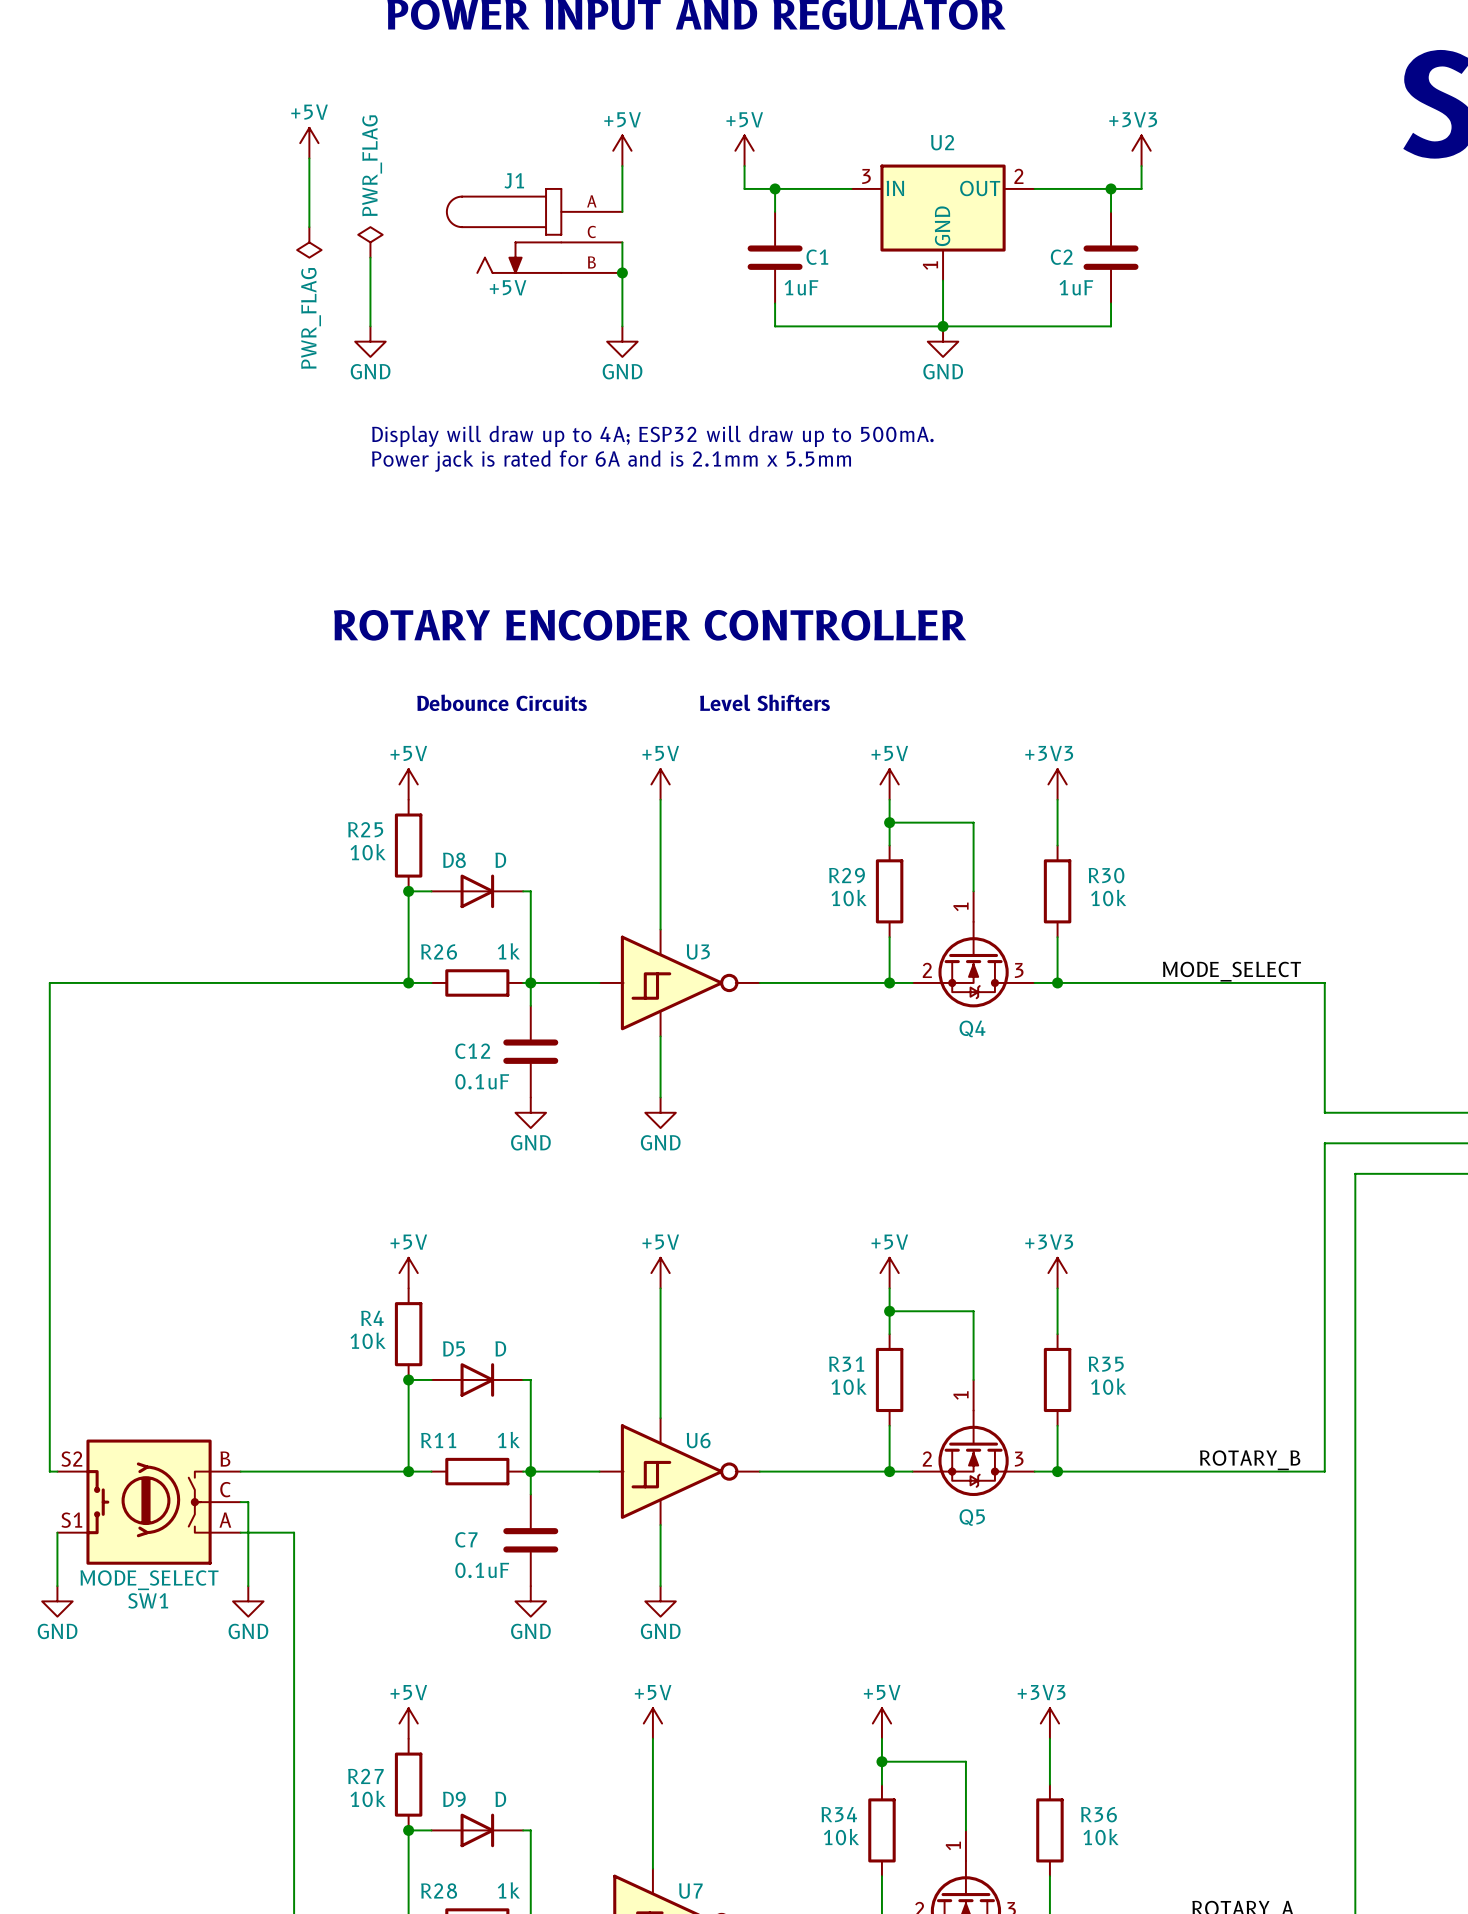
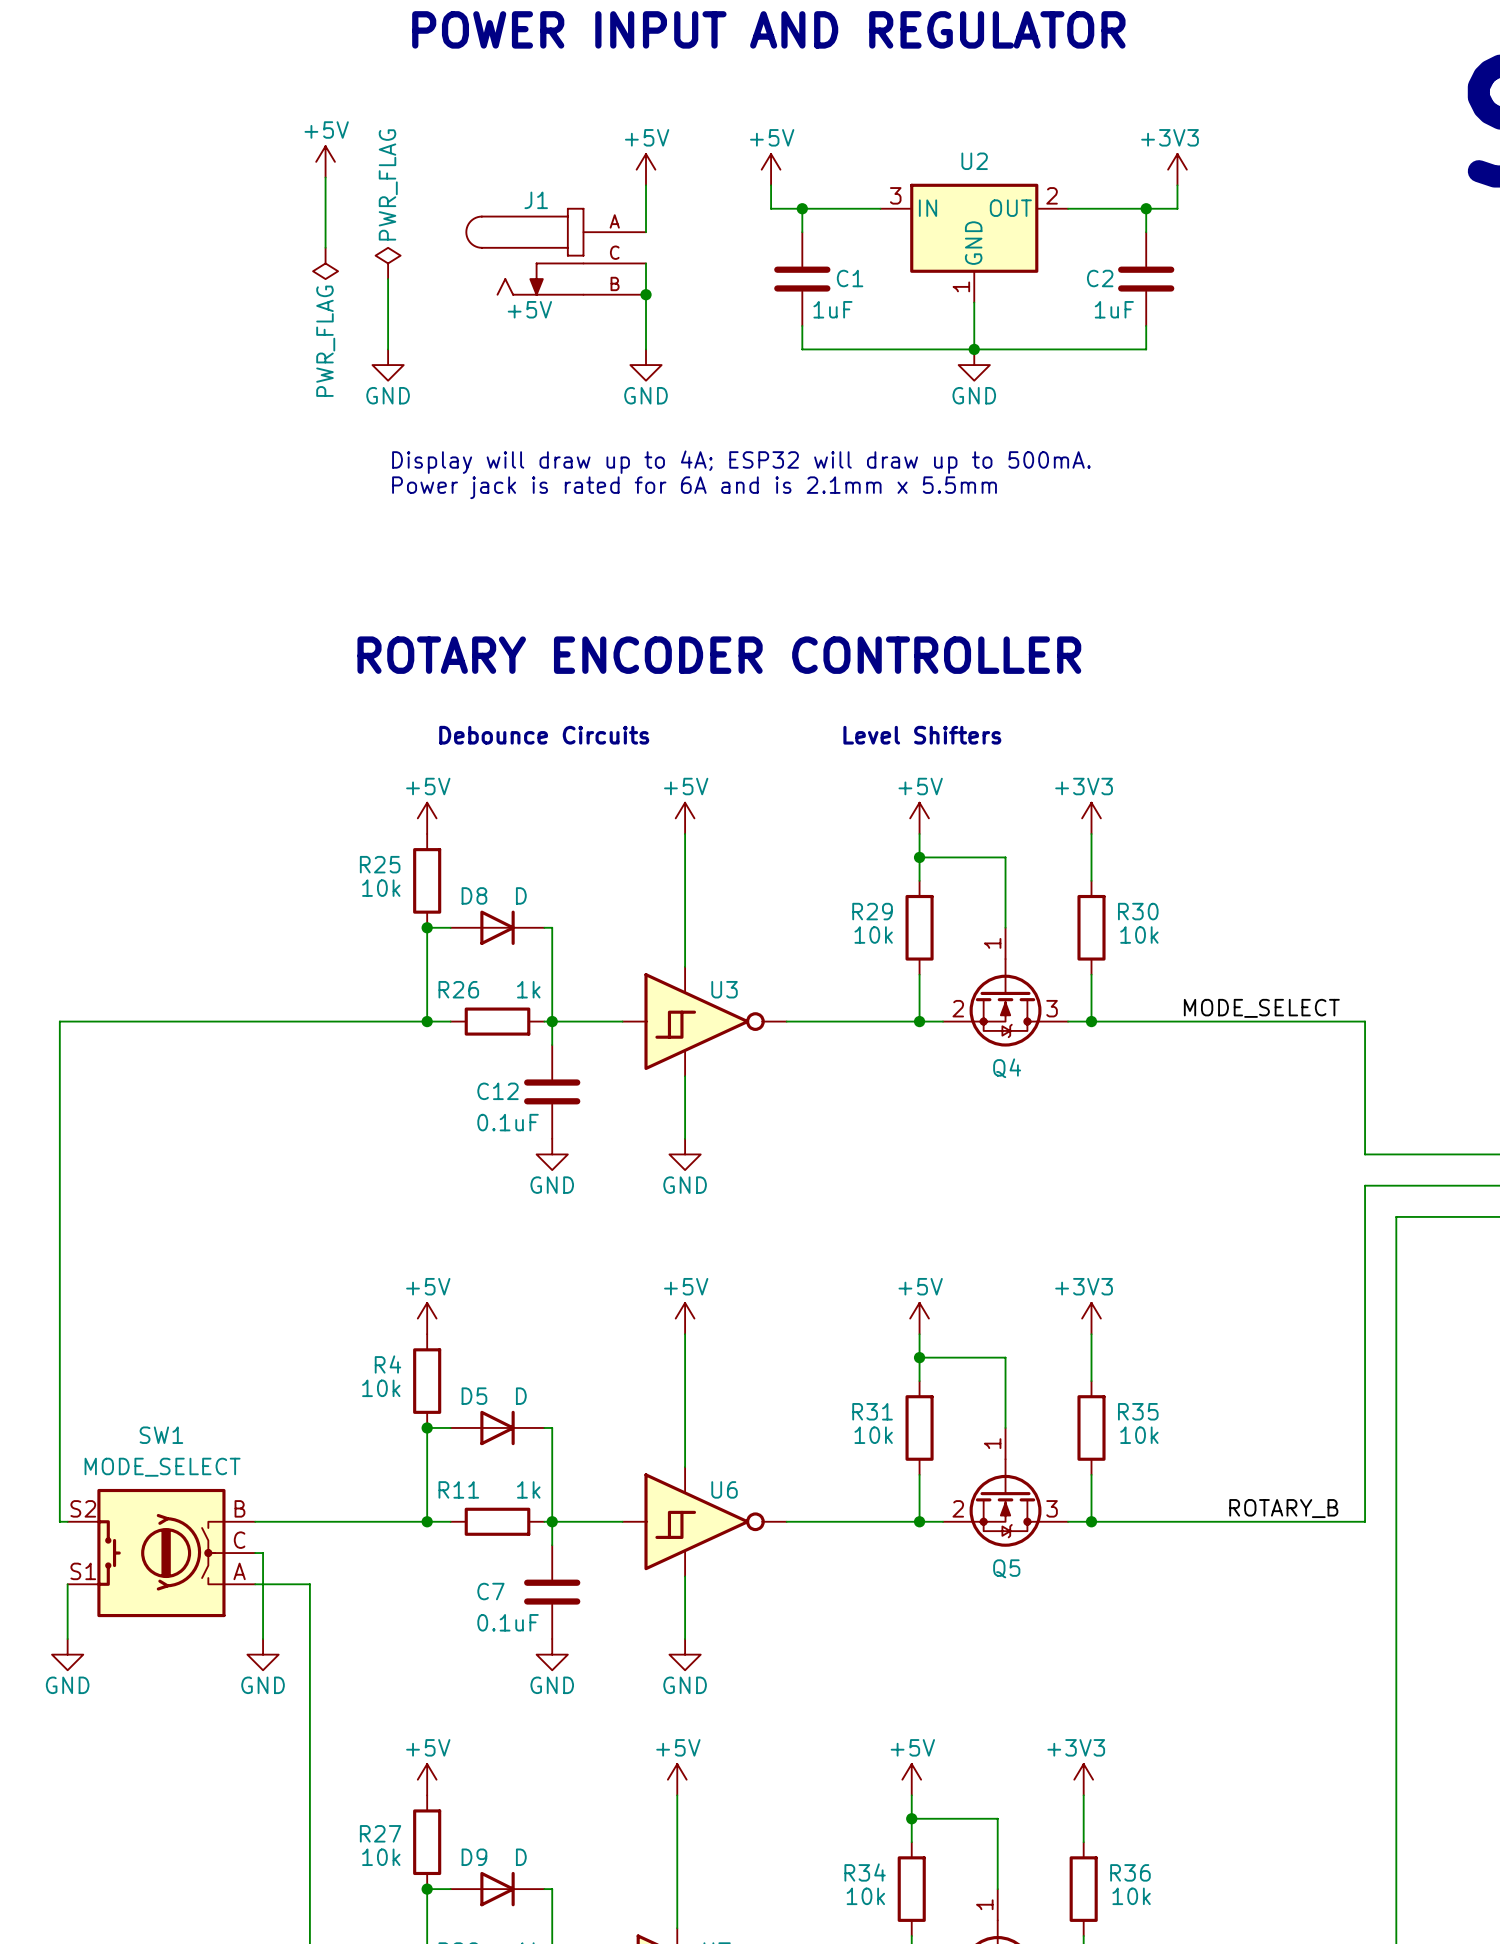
SW1 symbol: [57, 1439, 241, 1565] -> [67, 1488, 256, 1618]
SW1 value position: MODE_SELECT (149, 1580) -> MODE_SELECT (162, 1467)
SW1 name position: SW1 (148, 1600) -> SW1 (161, 1435)

